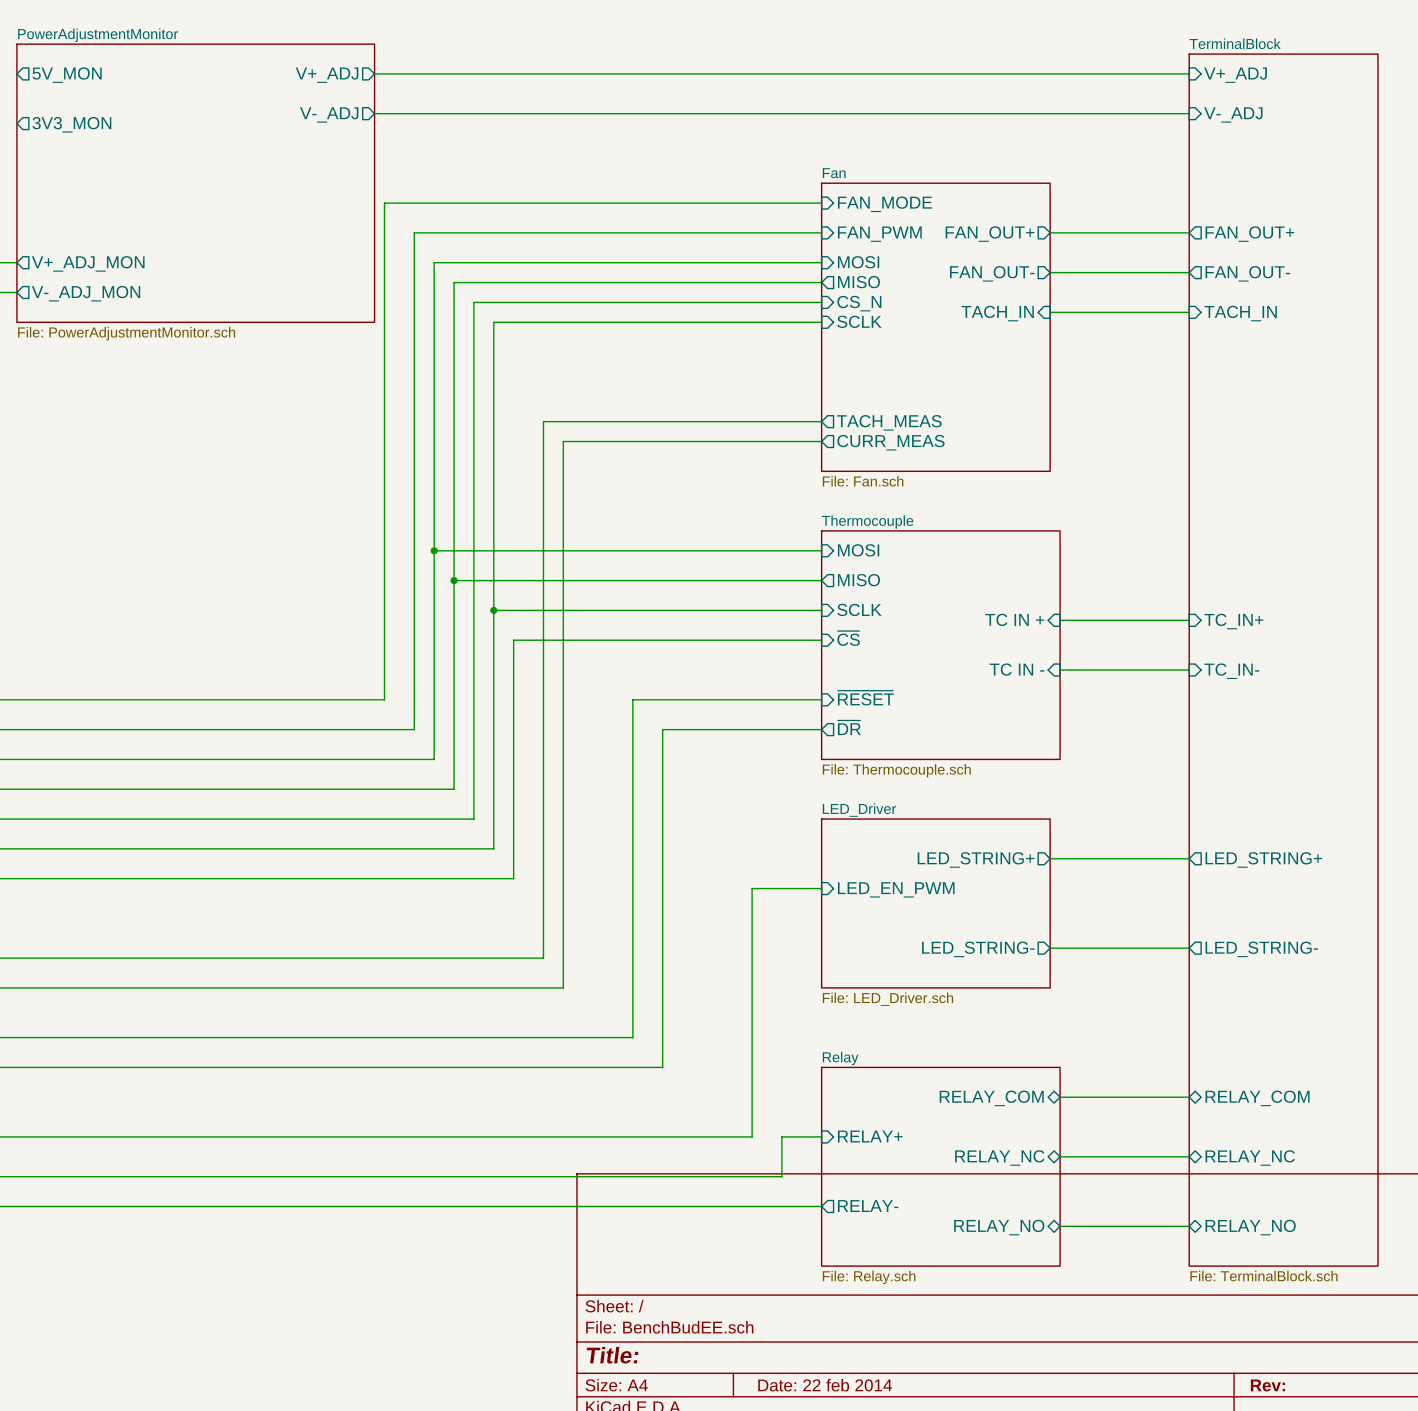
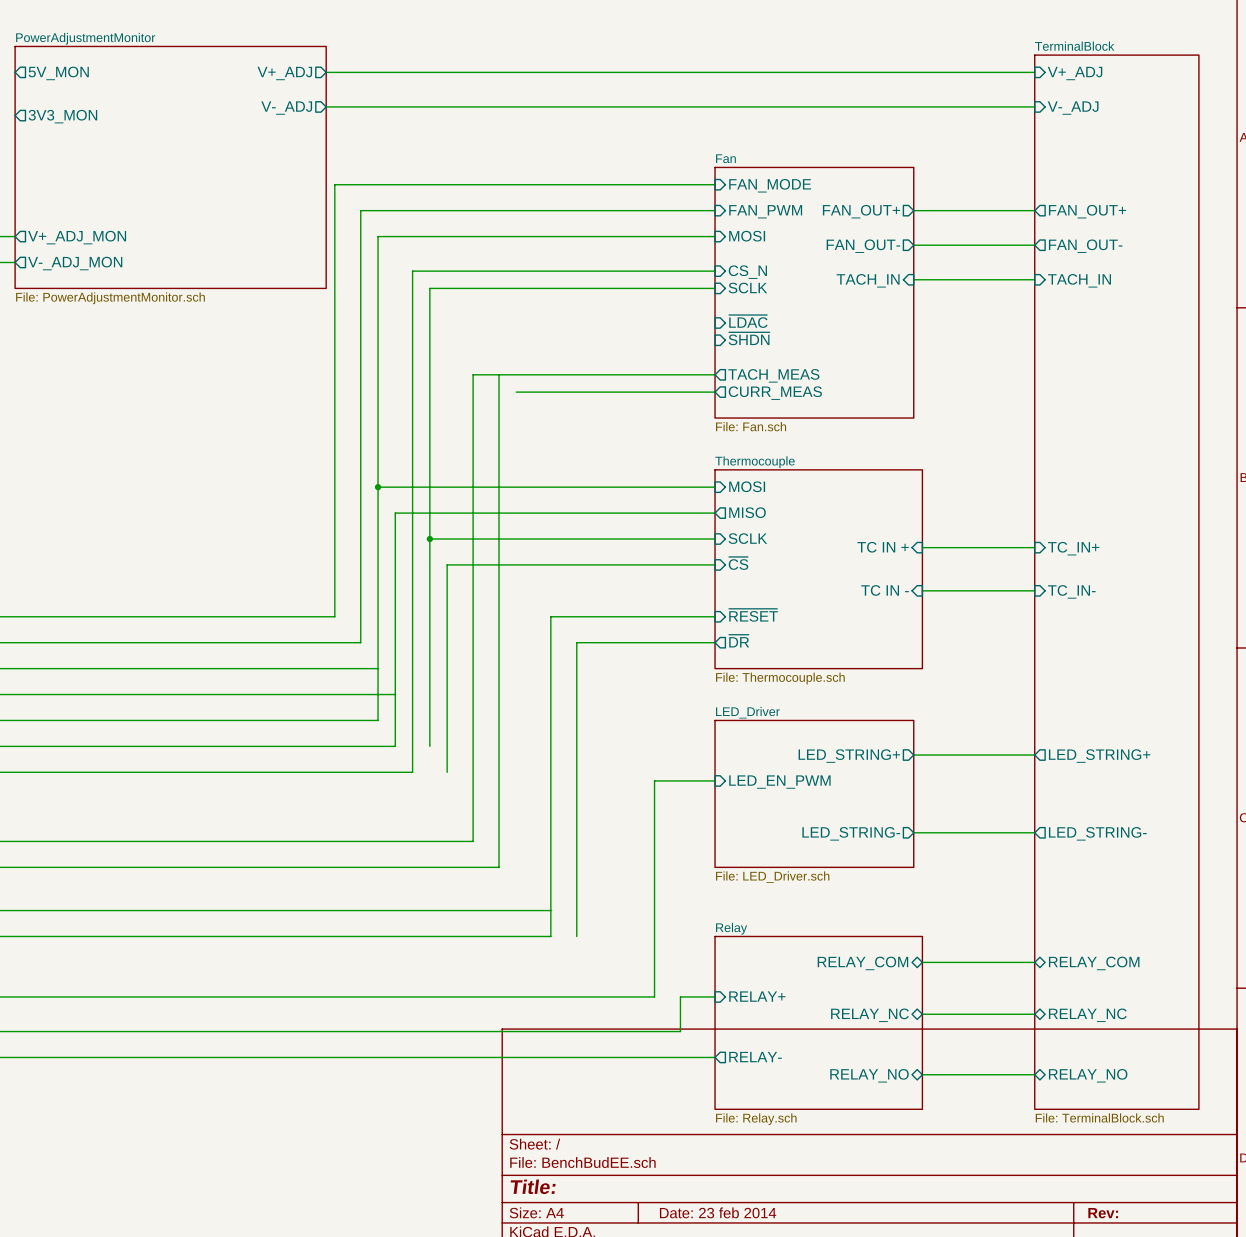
wire: (821, 282) (454, 282) (454, 580) -> none
sheet pin: MISO (858, 282) -> none
sheet pin: none -> ~{LDAC} (748, 321)
sheet pin: none -> ~{SHDN} (749, 338)
wire: (593, 441) (563, 441) (563, 987) -> (499, 374) (499, 867) (490, 867)
junction: (454, 580) -> none
wire: (434, 819) (473, 819) -> (378, 720) (378, 668)
wire: (454, 848) (493, 848) -> (395, 746) (395, 694)
wire: (473, 878) (513, 878) -> (412, 772) (412, 720)
wire: (632, 1067) (662, 1067) -> (550, 936) (550, 910)
title block: Date: 22 feb 2014 (825, 1385) -> Date: 23 feb 2014 (718, 1212)

